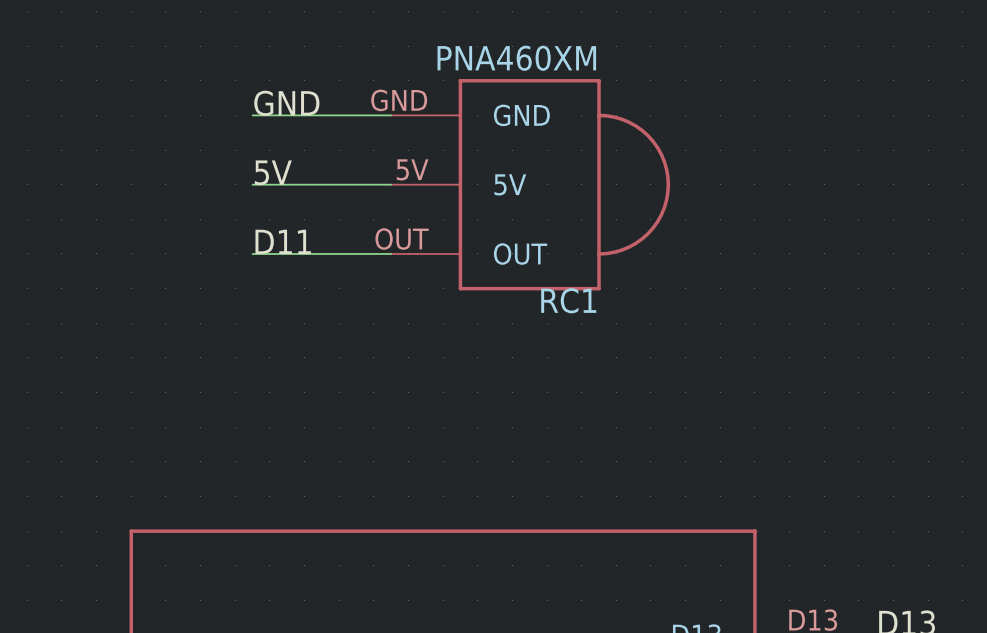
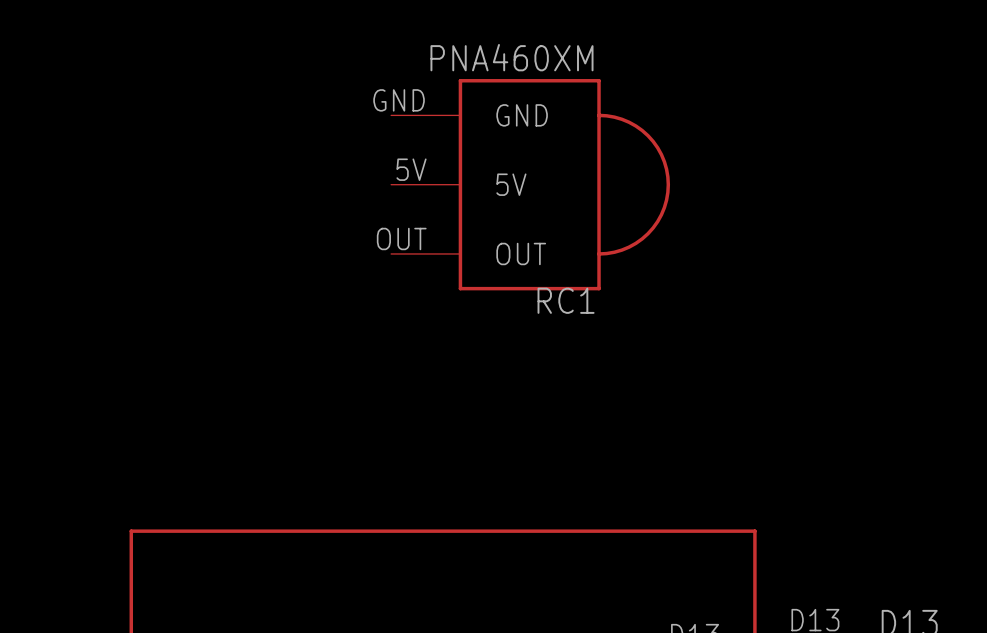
label: GND (286, 103) -> none
wire: (252, 115) (391, 115) -> none
label: 5V (273, 172) -> none
wire: (252, 184) (391, 184) -> none
label: D11 (283, 241) -> none
wire: (252, 253) (391, 253) -> none

